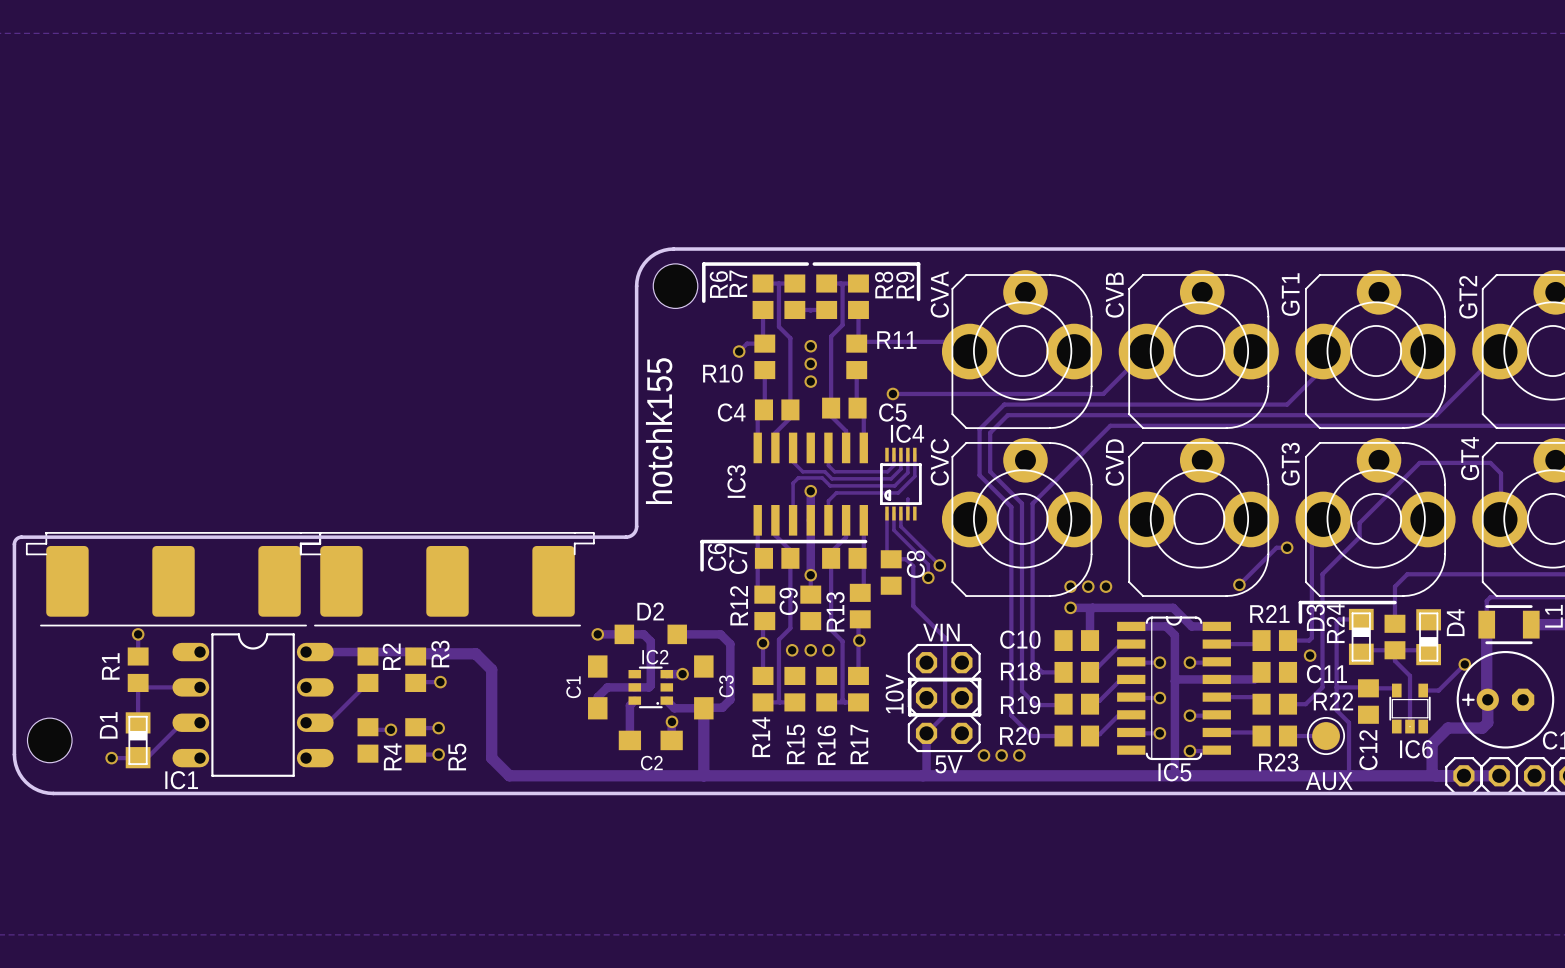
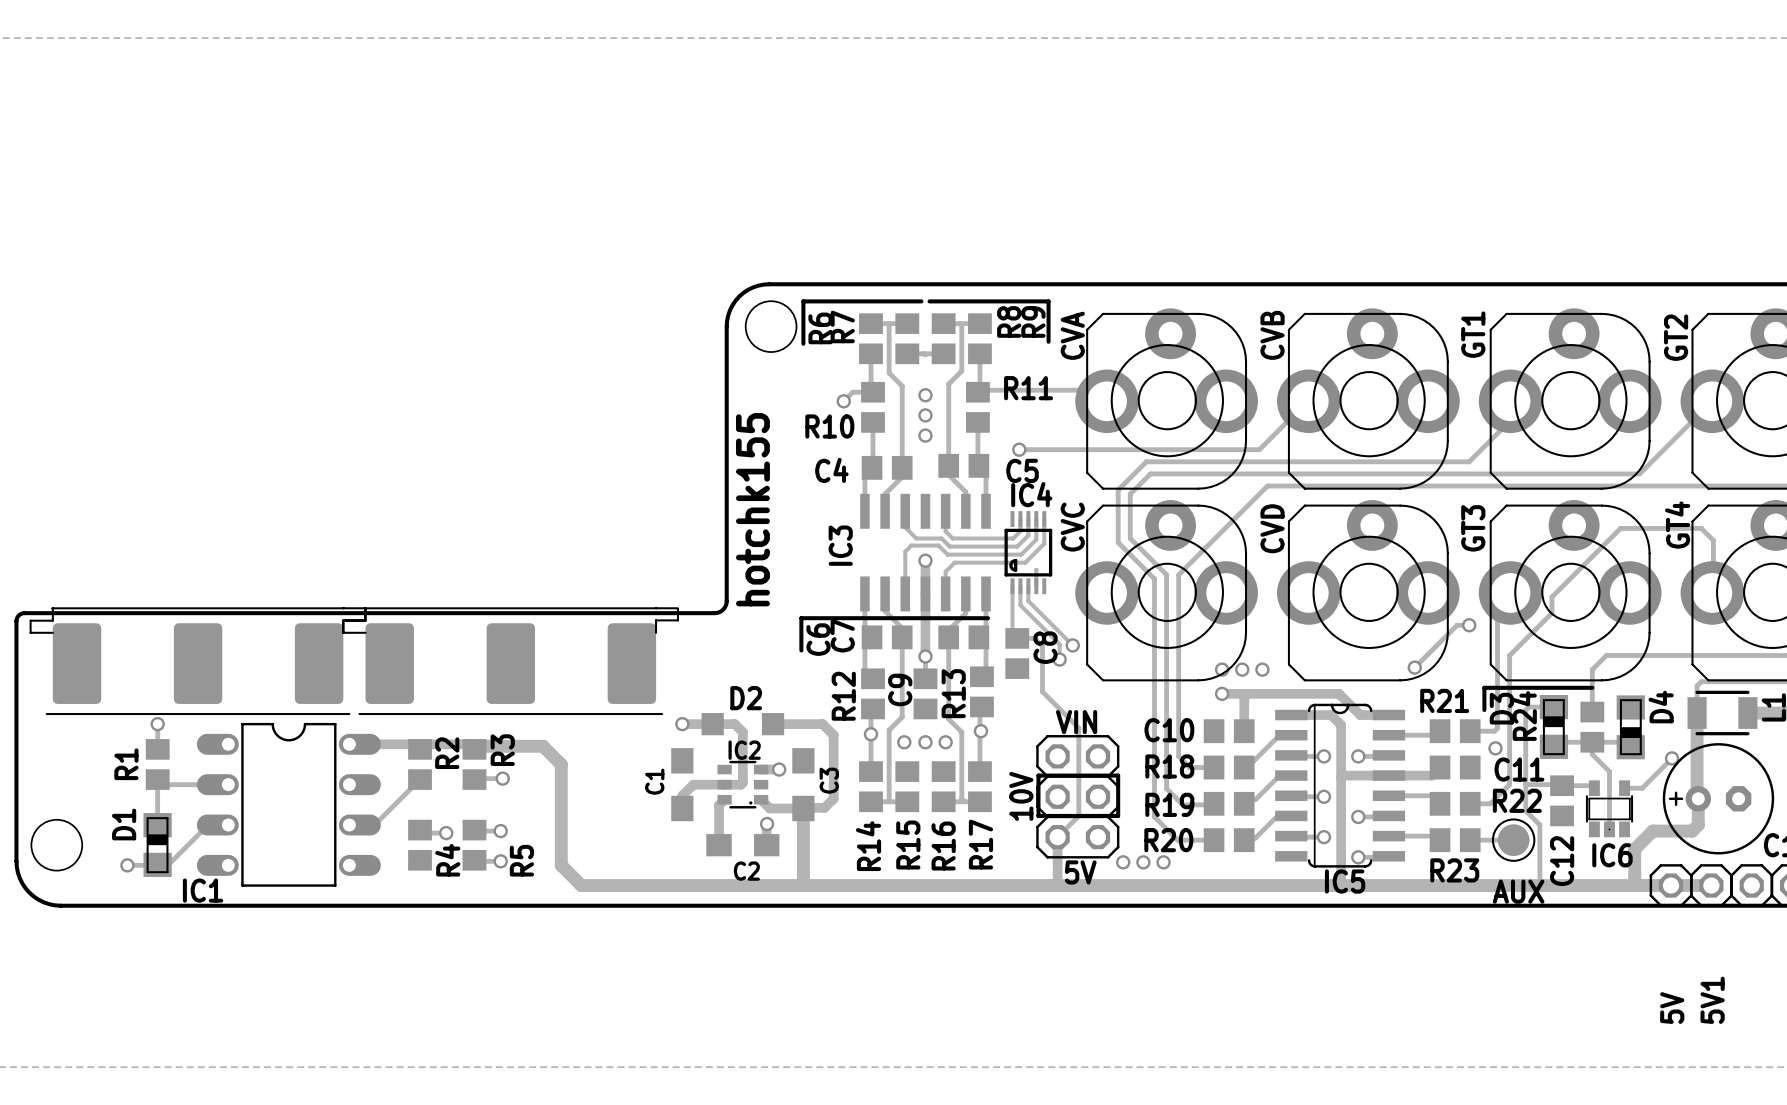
5V1 name: none -> 5V1 (1712, 1000)
5V name: none -> 5V (1672, 1008)

